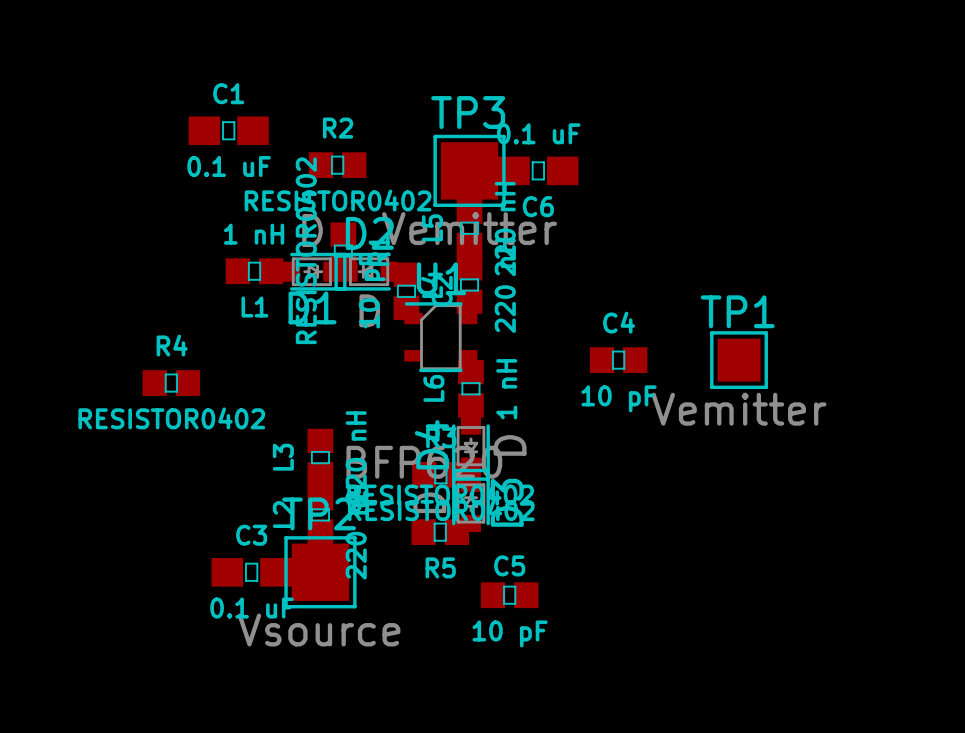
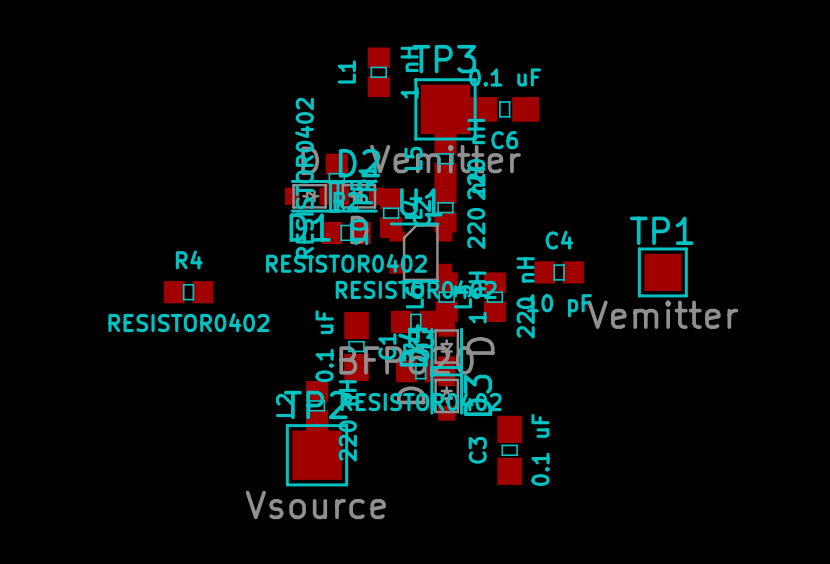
C1 rotation: 0° (228, 130) -> 90° clockwise (356, 346)
C1 position: (228, 130) -> (356, 346)
R2 position: (337, 165) -> (346, 232)
L1 rotation: 0° (254, 271) -> 90° clockwise (378, 72)
L1 position: (254, 271) -> (378, 72)
C4 position: (618, 360) -> (559, 272)
TP1 position: (739, 360) -> (662, 272)
L3 position: (320, 457) -> (494, 297)
R5 position: (440, 532) -> (415, 321)
C3 rotation: 0° (251, 572) -> 90° clockwise (509, 450)
C3 position: (251, 572) -> (509, 450)
C5: 10 pF (509, 595) -> none

